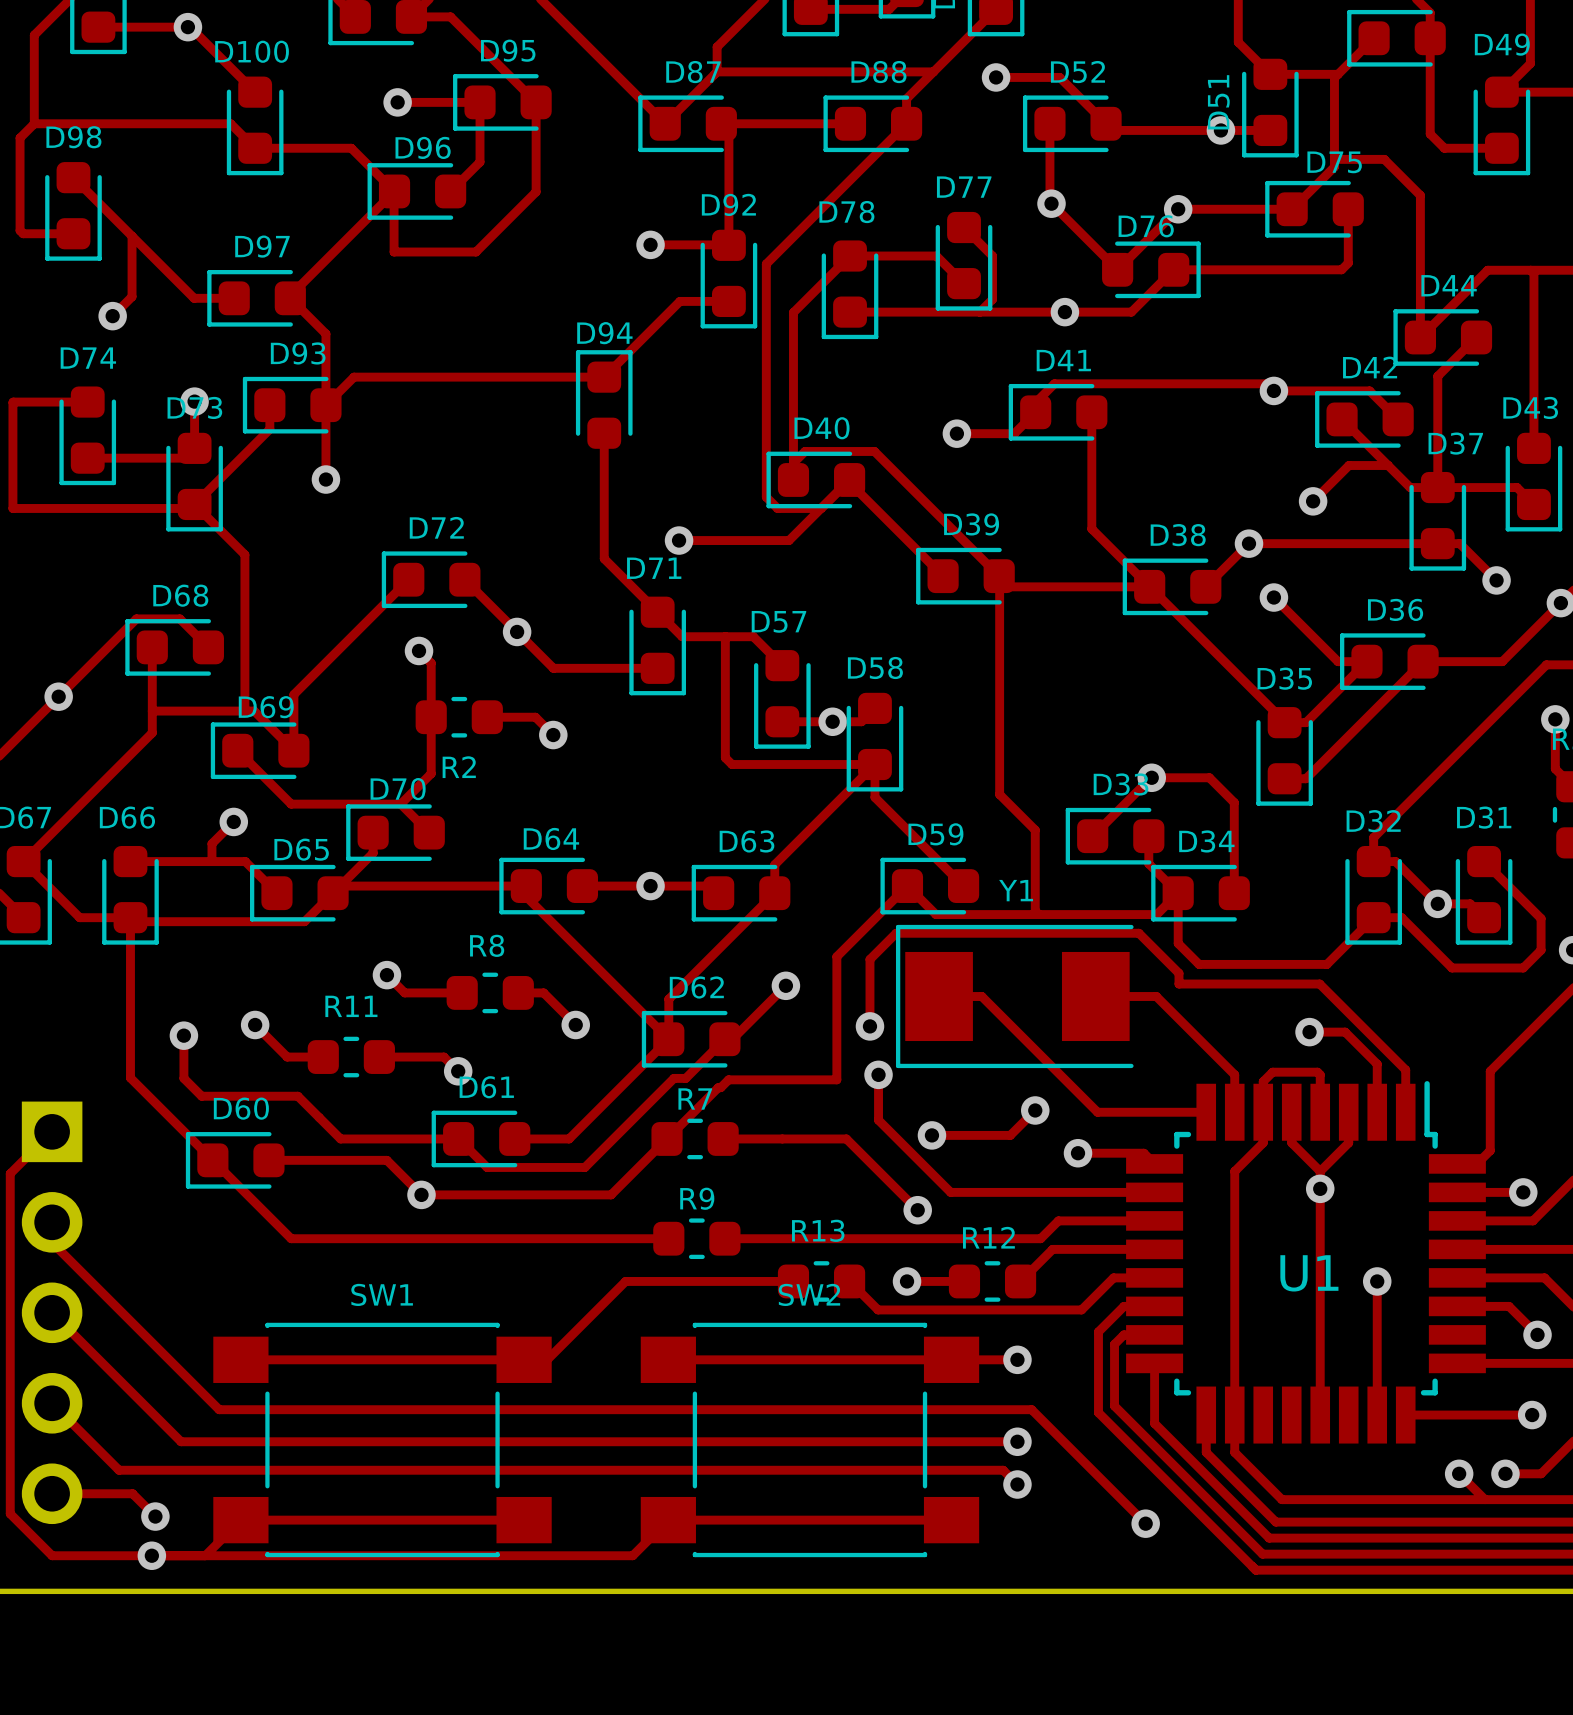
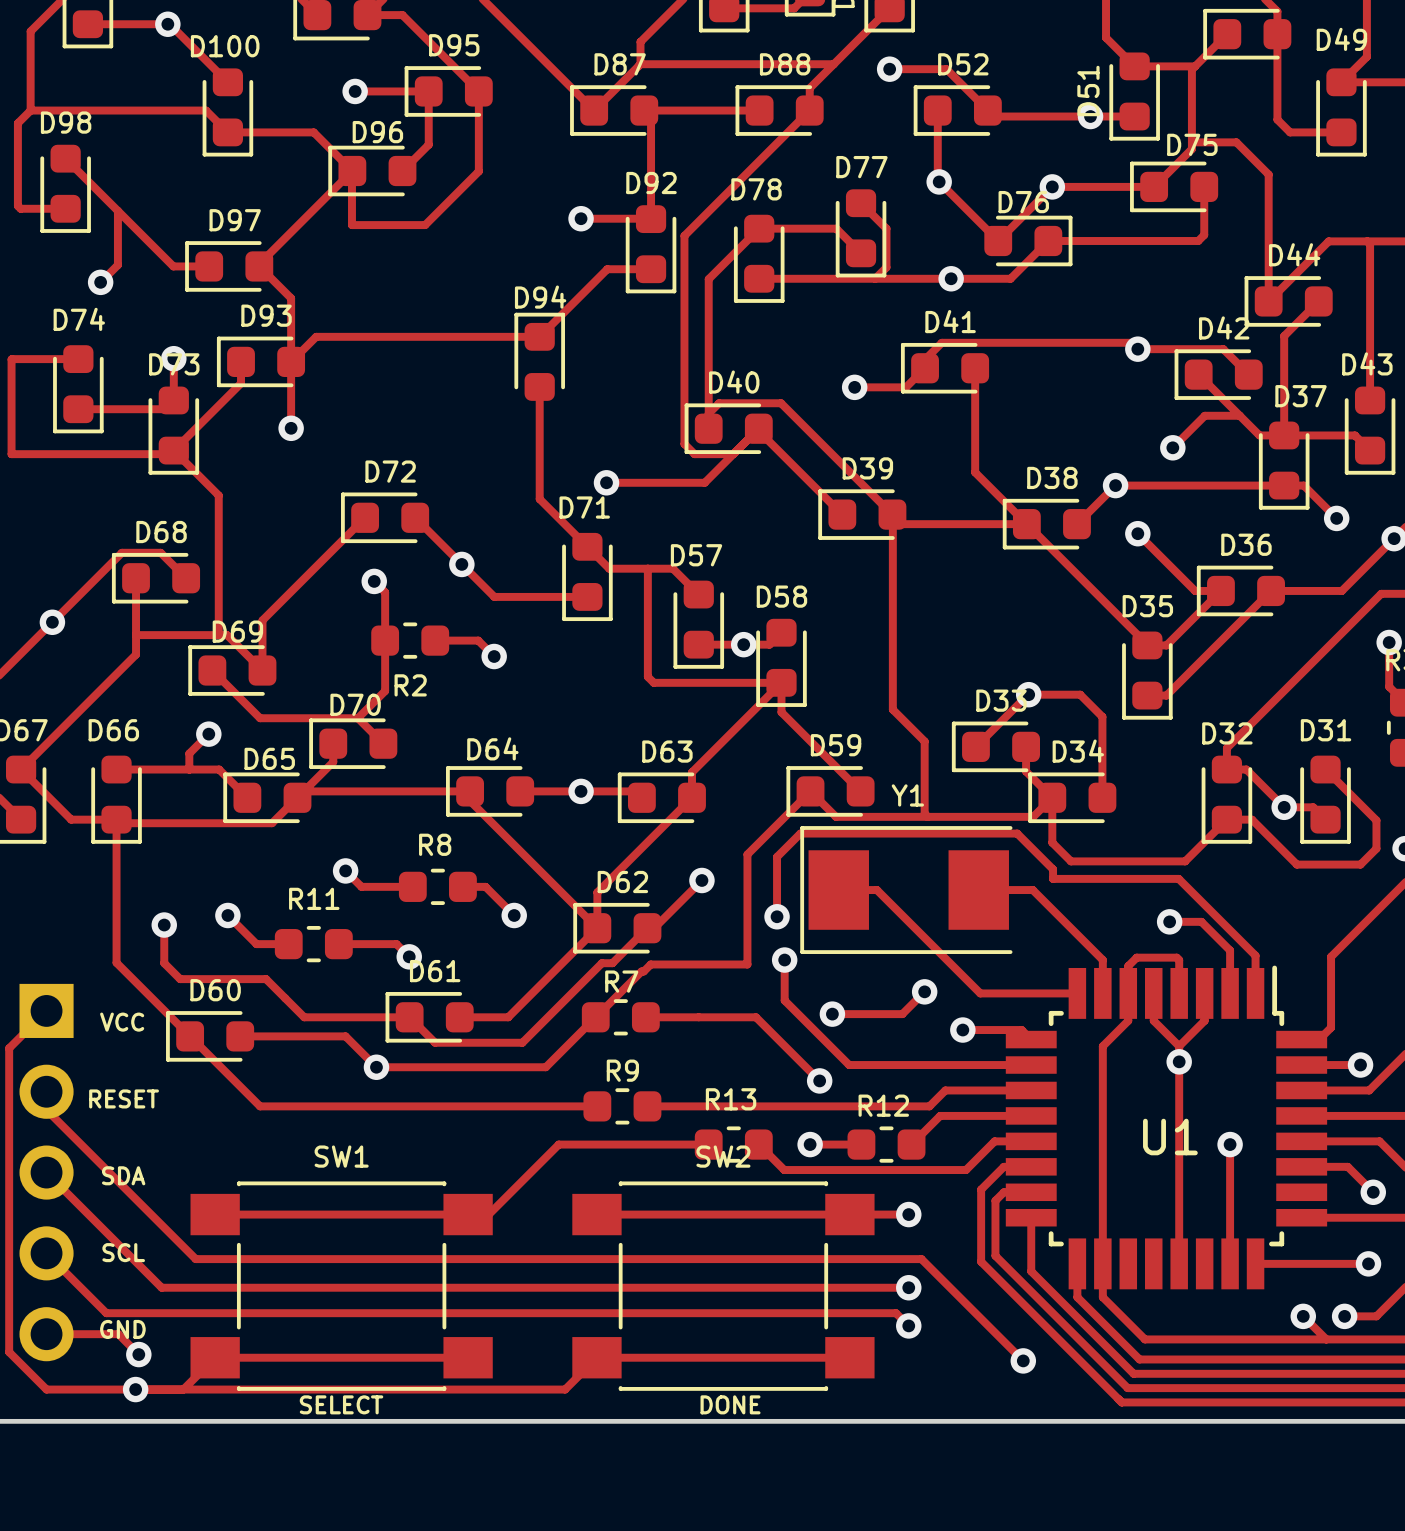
text: none -> VCC (122, 1022)
text: none -> RESET (124, 1098)
text: none -> SDA (123, 1175)
text: none -> SCL (123, 1252)
text: none -> GND (122, 1329)
text: none -> SELECT DONE (530, 1404)

